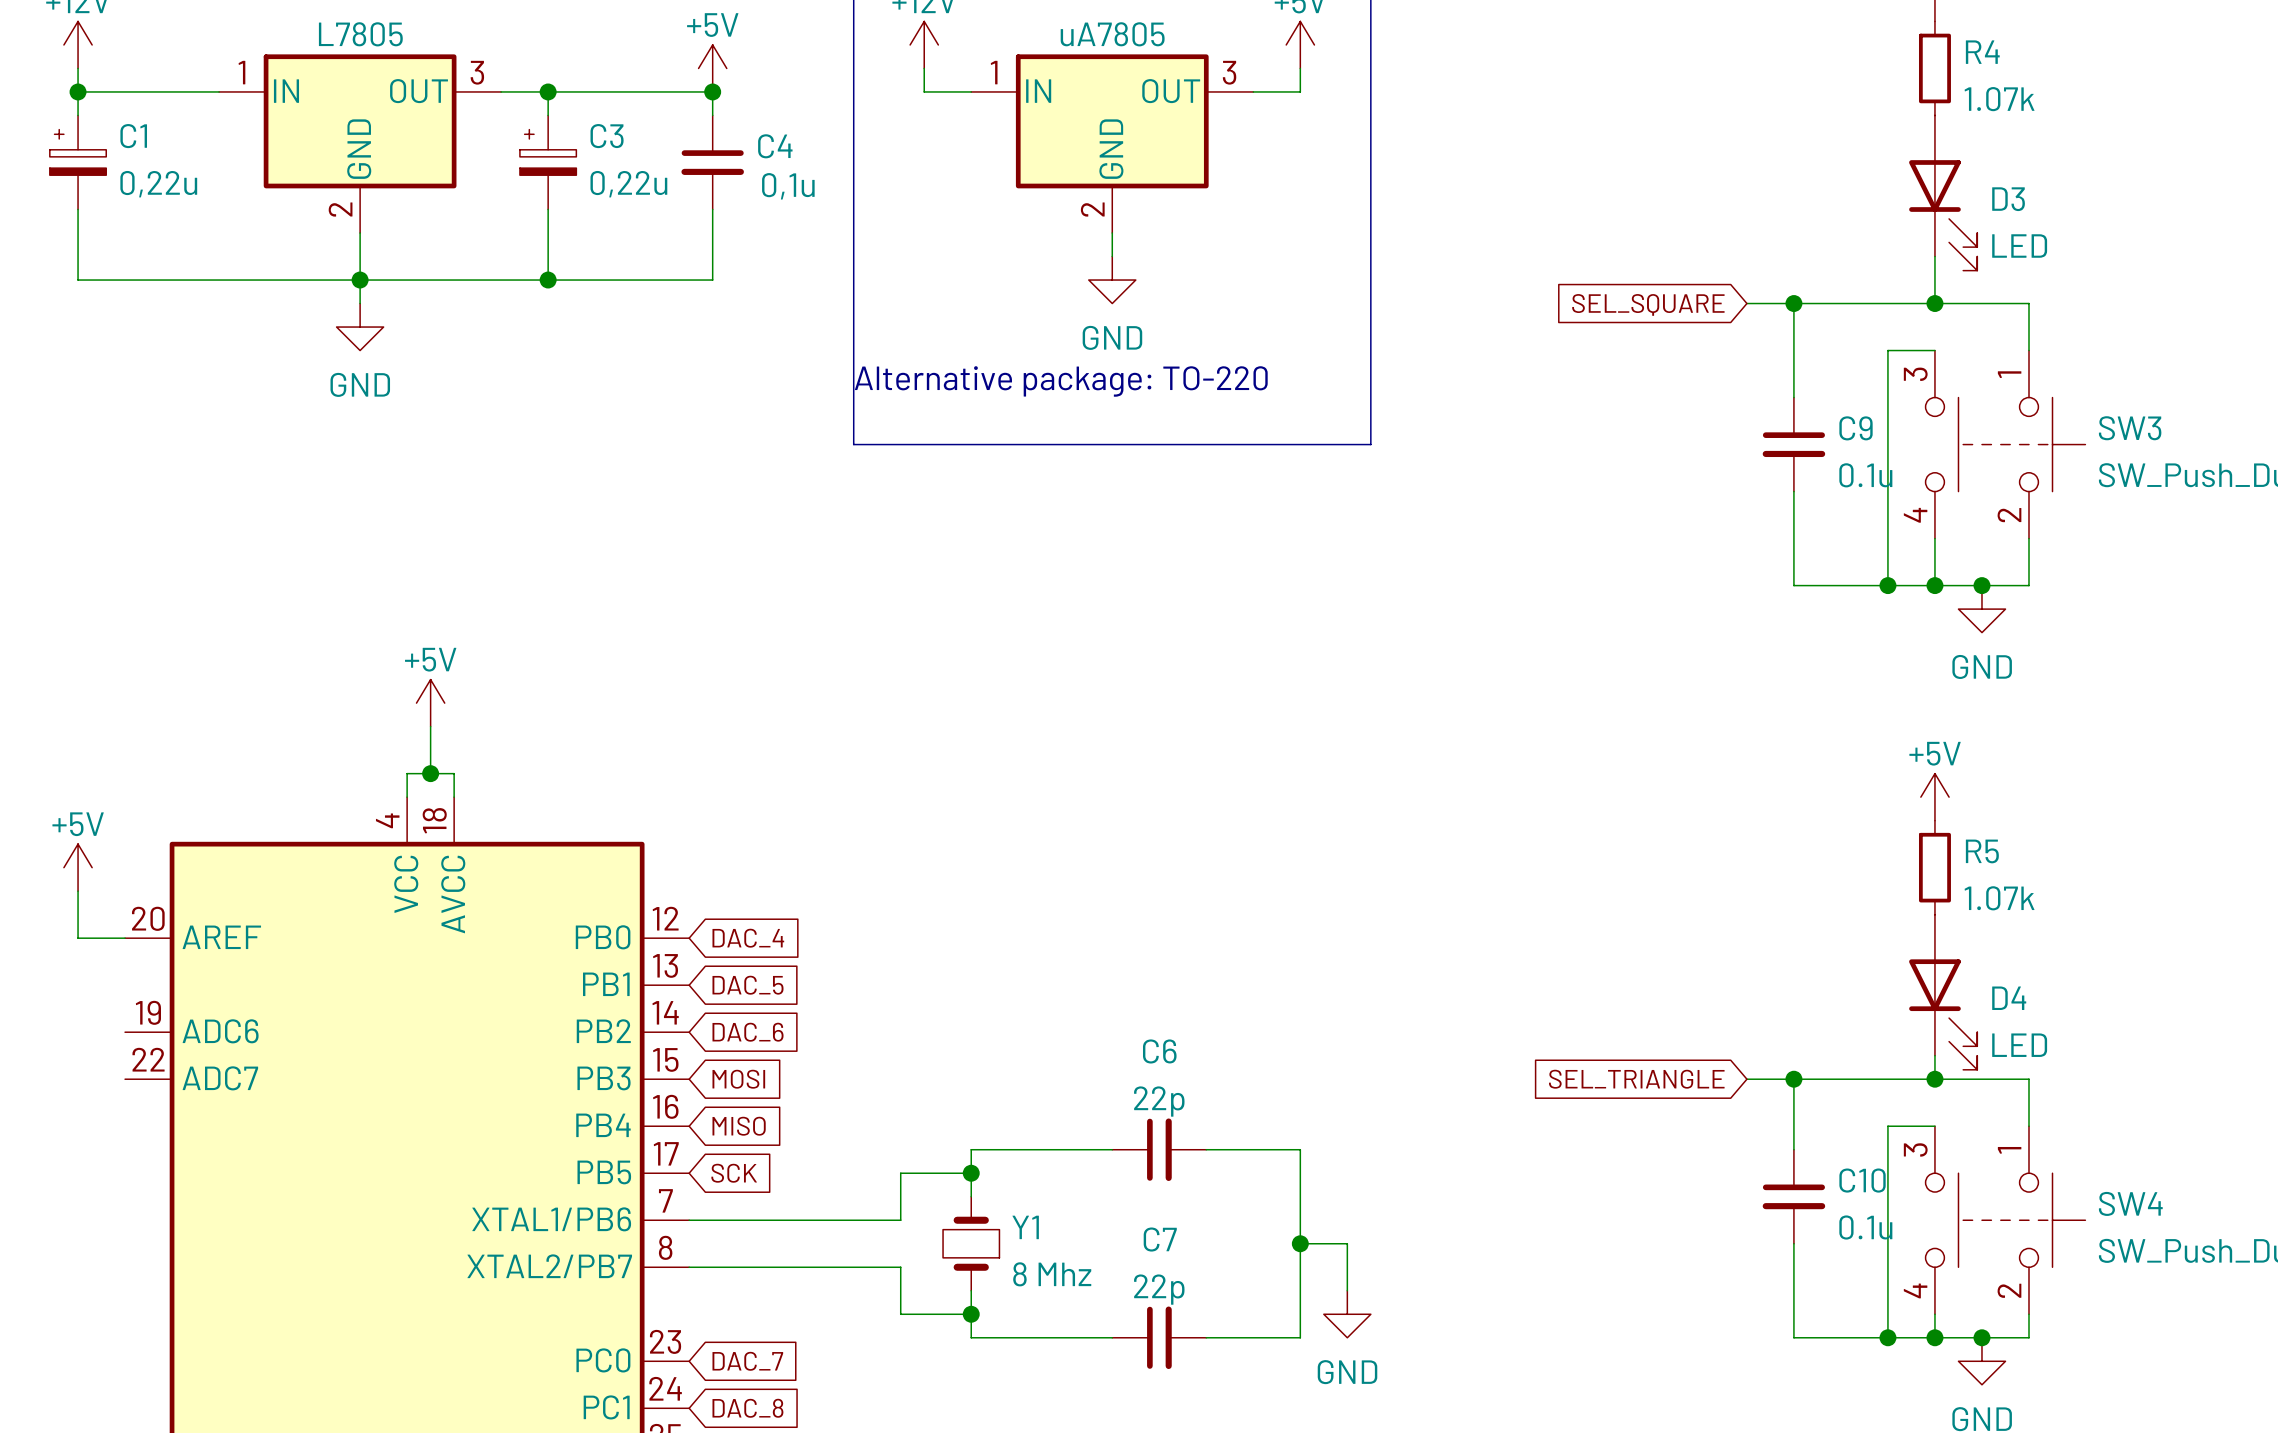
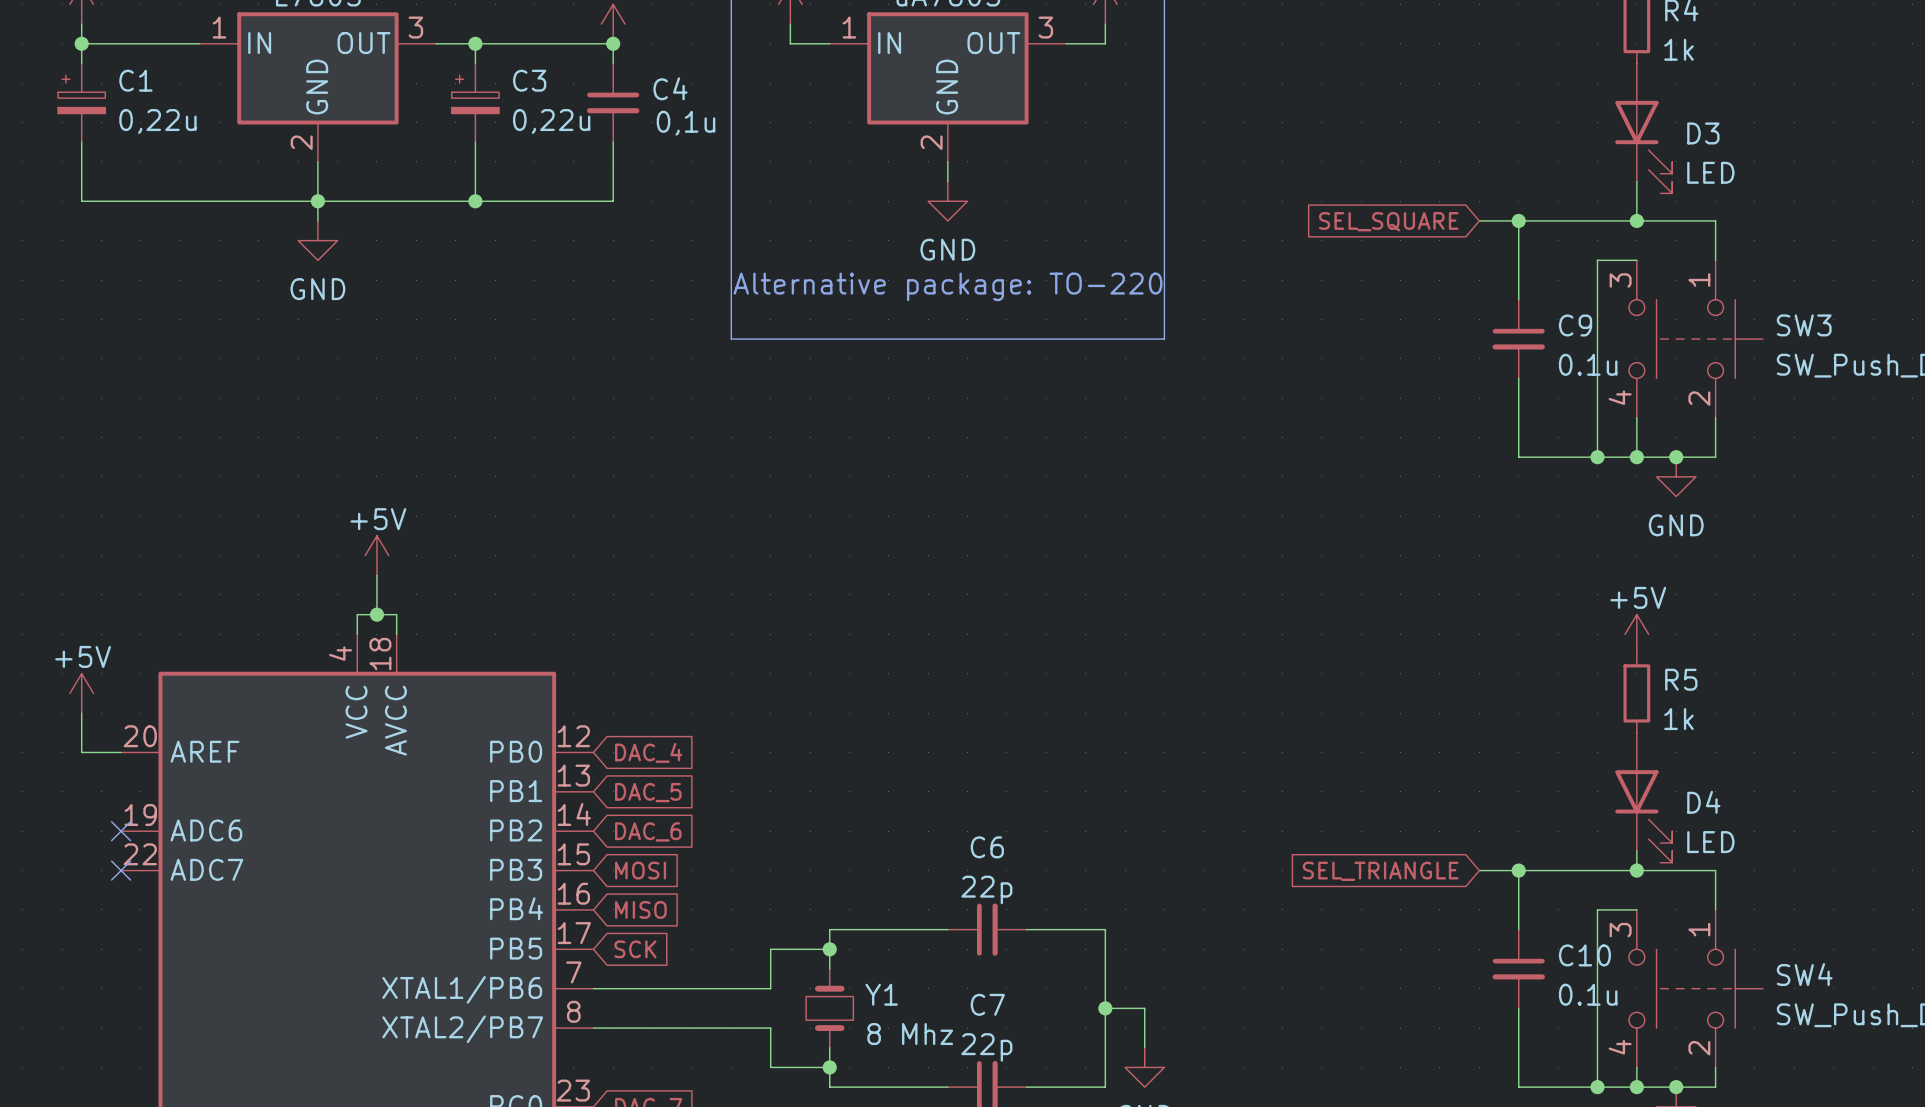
R4 value: 1.07k (1999, 99) -> 1k (1678, 49)
R5 value: 1.07k (1999, 898) -> 1k (1678, 719)
no-connect mark: none -> (121, 831)
no-connect mark: none -> (121, 870)

